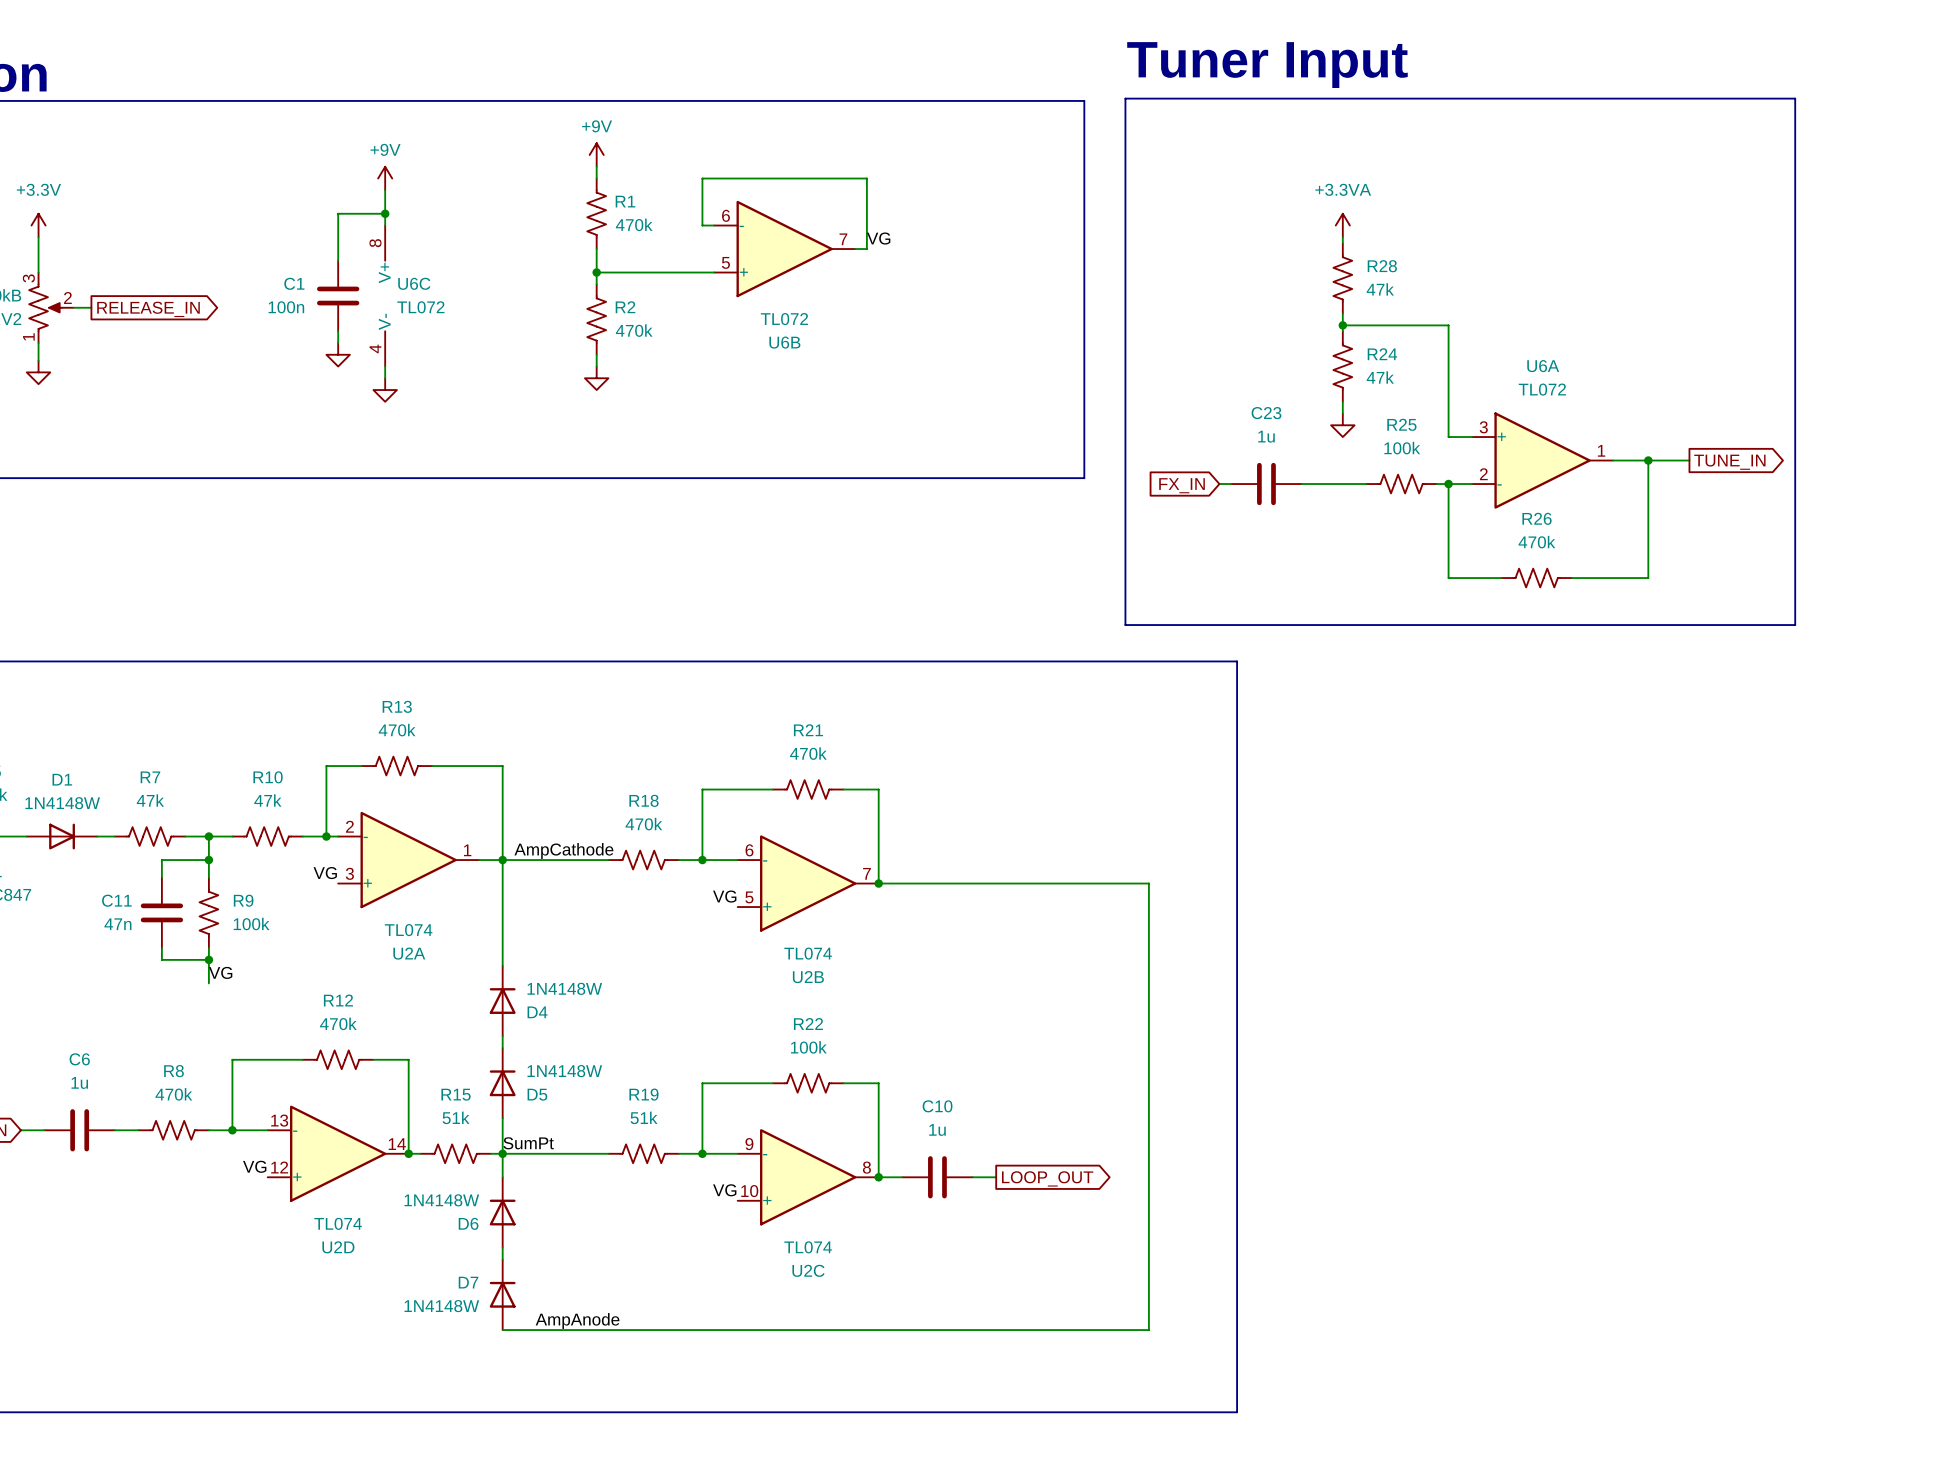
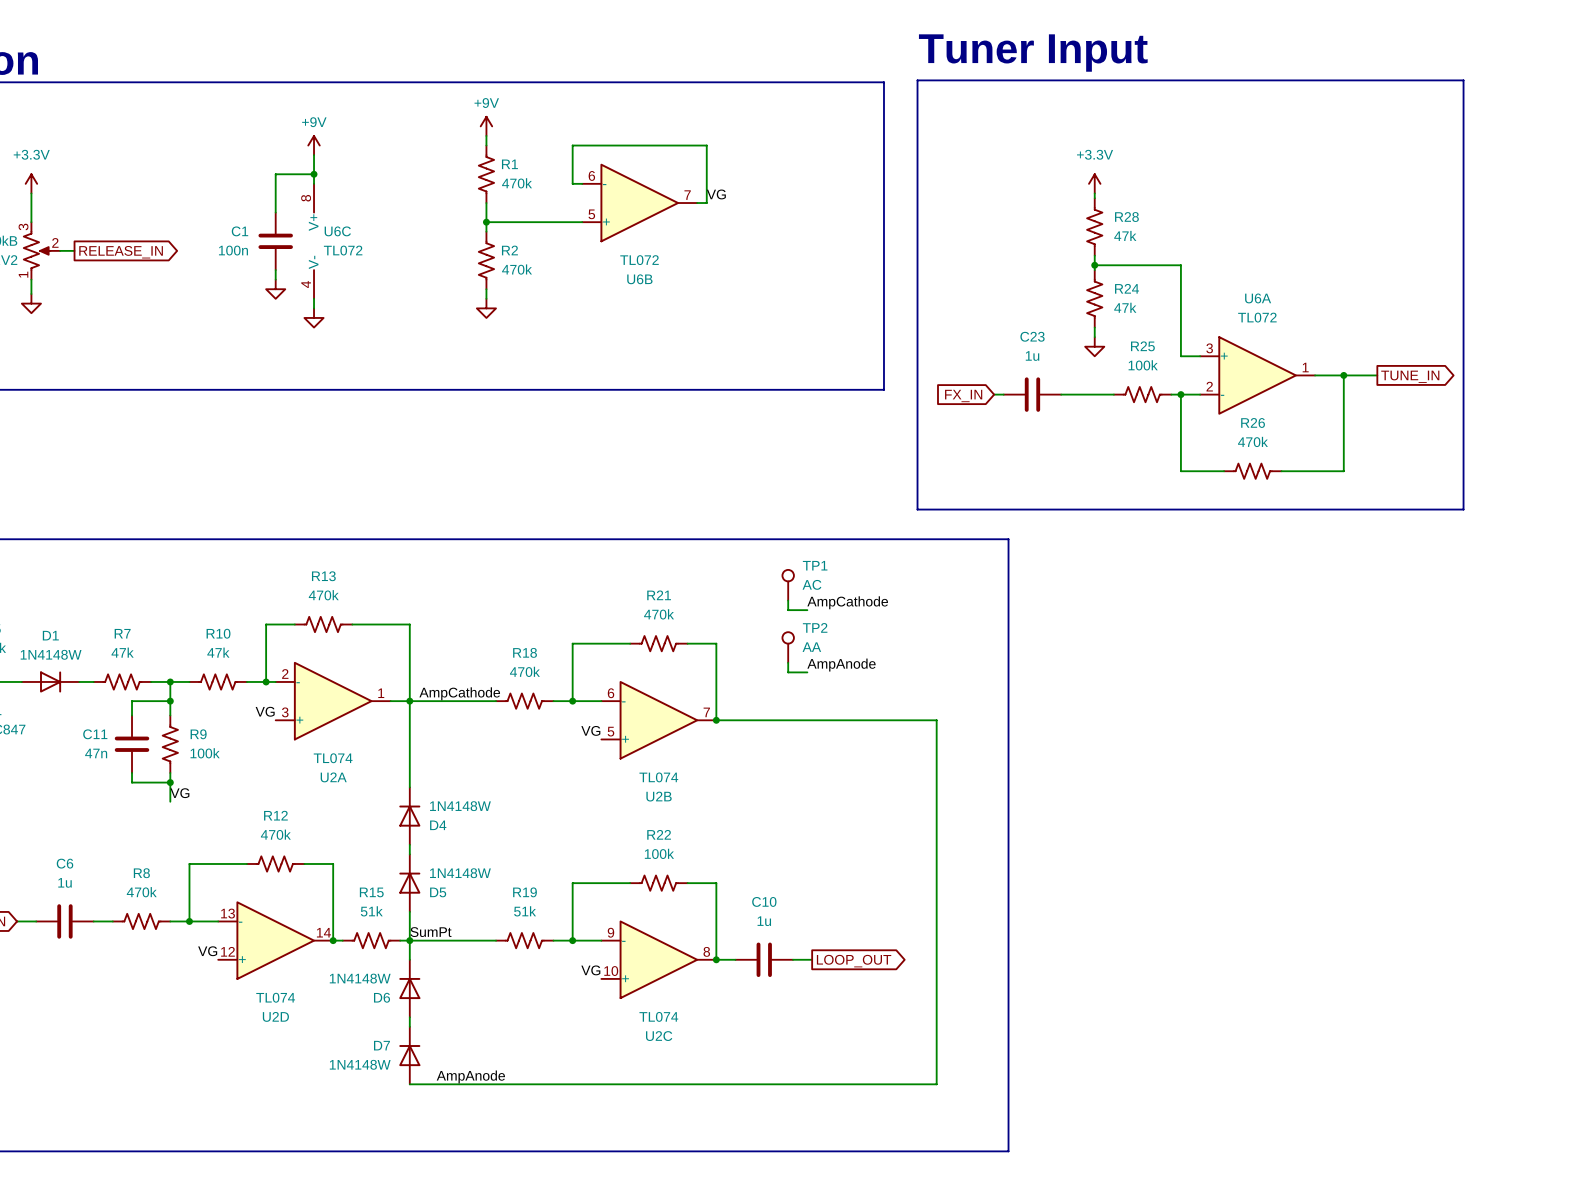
power symbol: +3.3VA (1342, 225) -> +3.3V (1094, 183)
TP1: none -> AC (788, 585)
wire: none -> (788, 600) (788, 610) (807, 610)
label: none -> AmpCathode (847, 602)
TP2: none -> AA (788, 647)
wire: none -> (788, 662) (788, 672) (807, 672)
label: none -> AmpAnode (841, 665)

